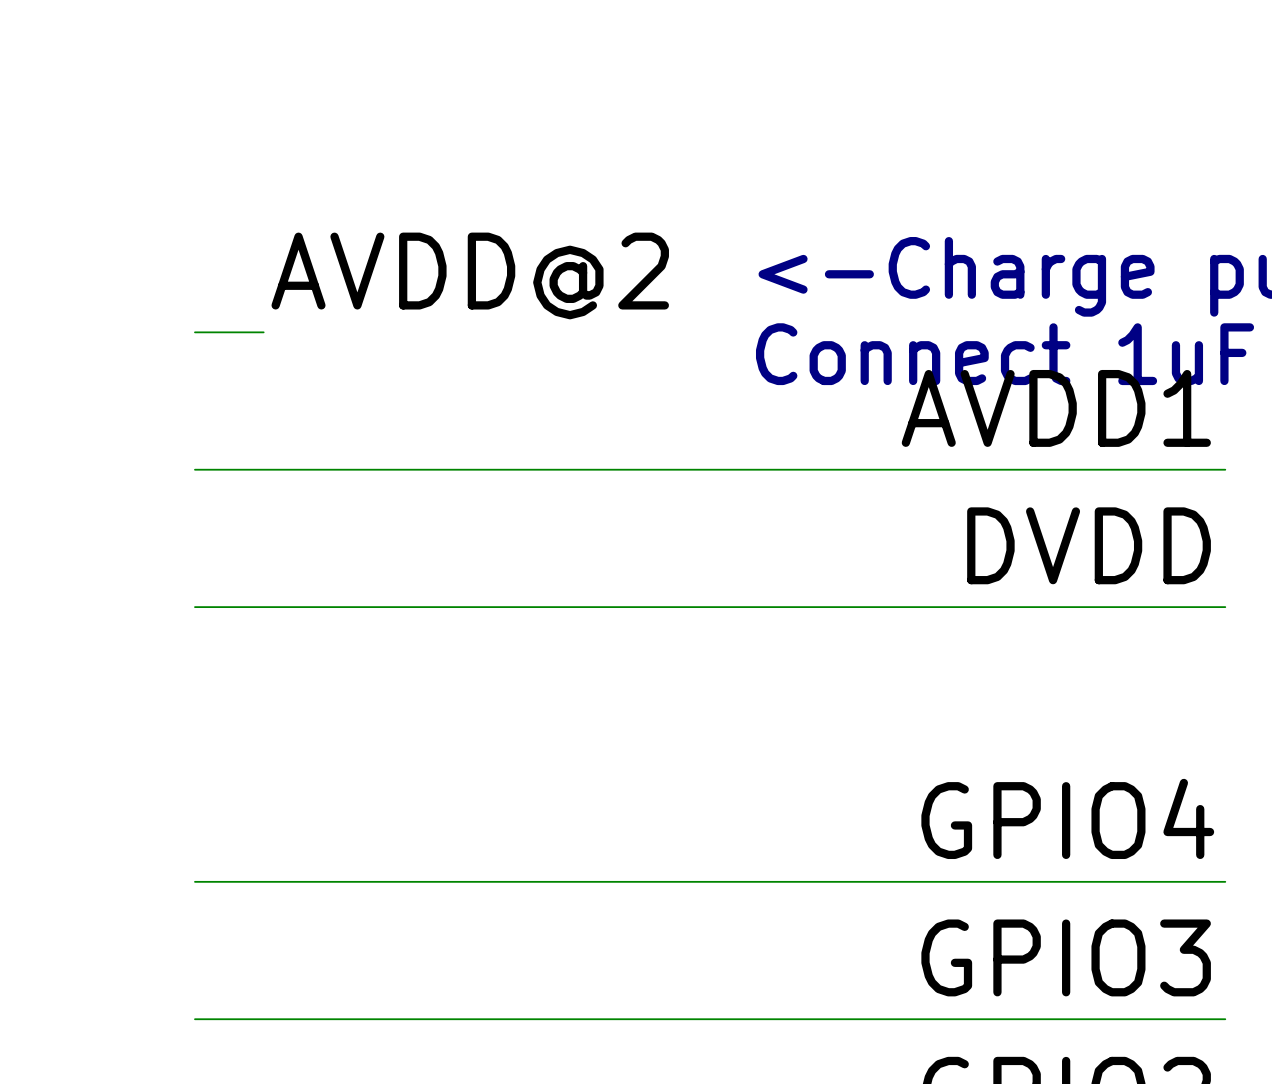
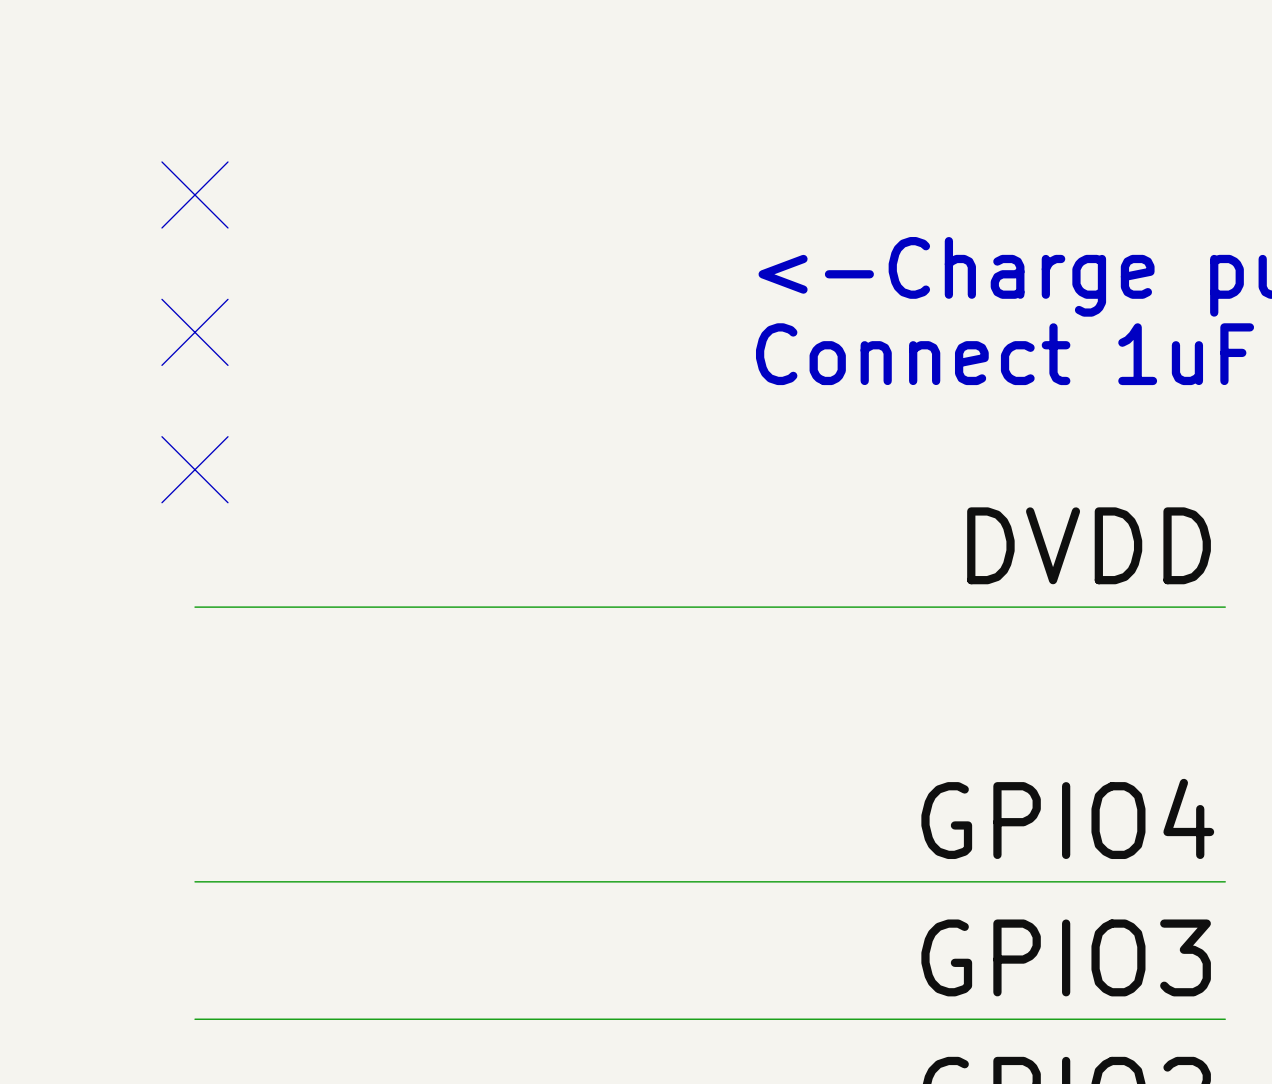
no-connect mark: none -> (194, 194)
label: AVDD@2 (470, 275) -> none
wire: (194, 332) (263, 332) -> none
no-connect mark: none -> (194, 332)
label: AVDD1 (1056, 408) -> none
wire: (194, 469) (1225, 469) -> none
no-connect mark: none -> (194, 469)

